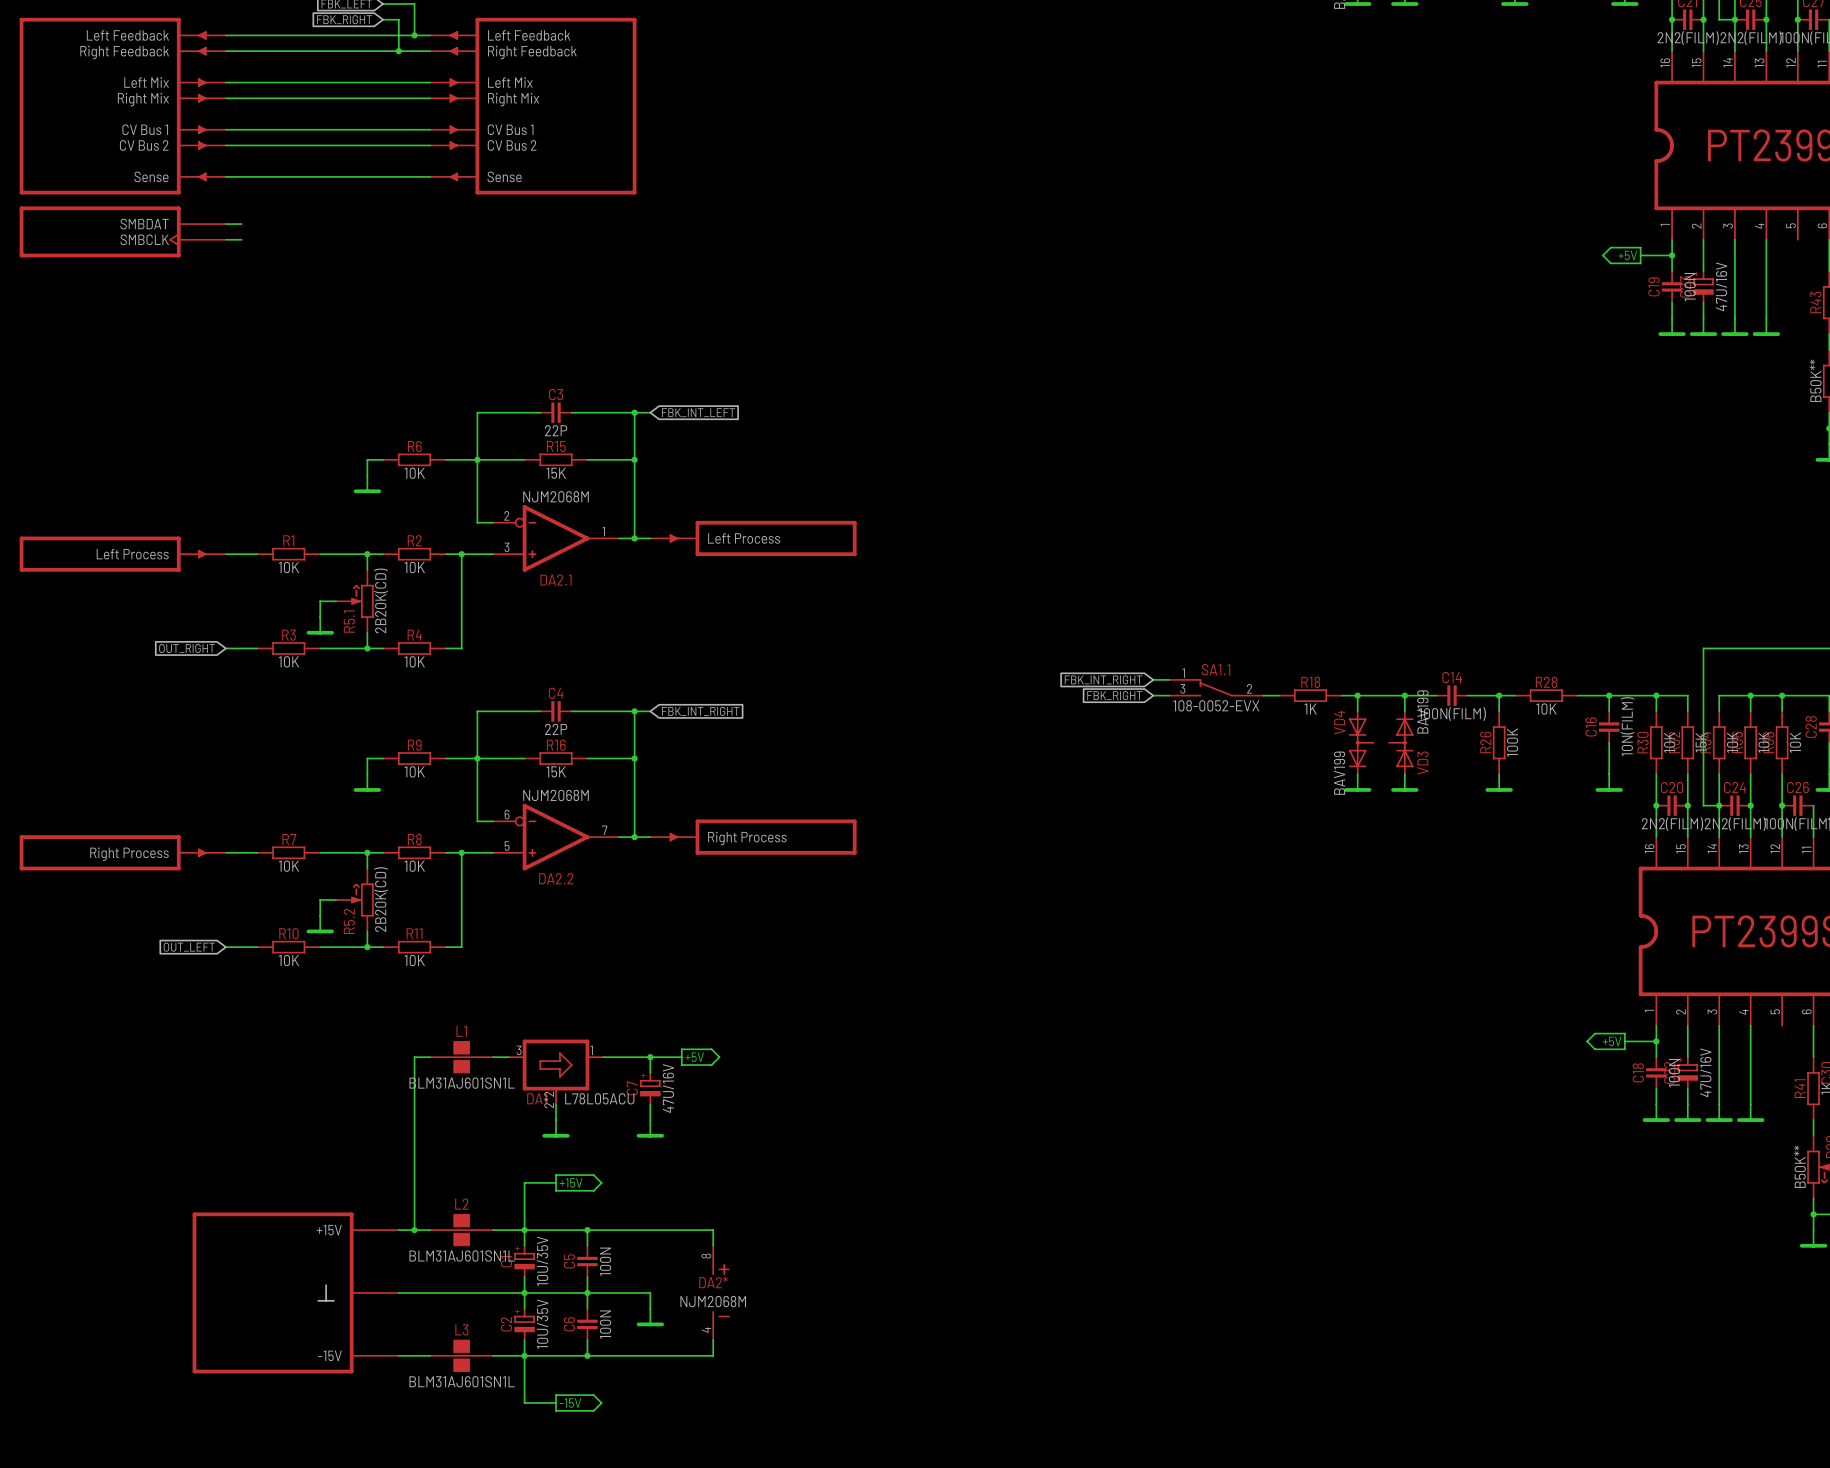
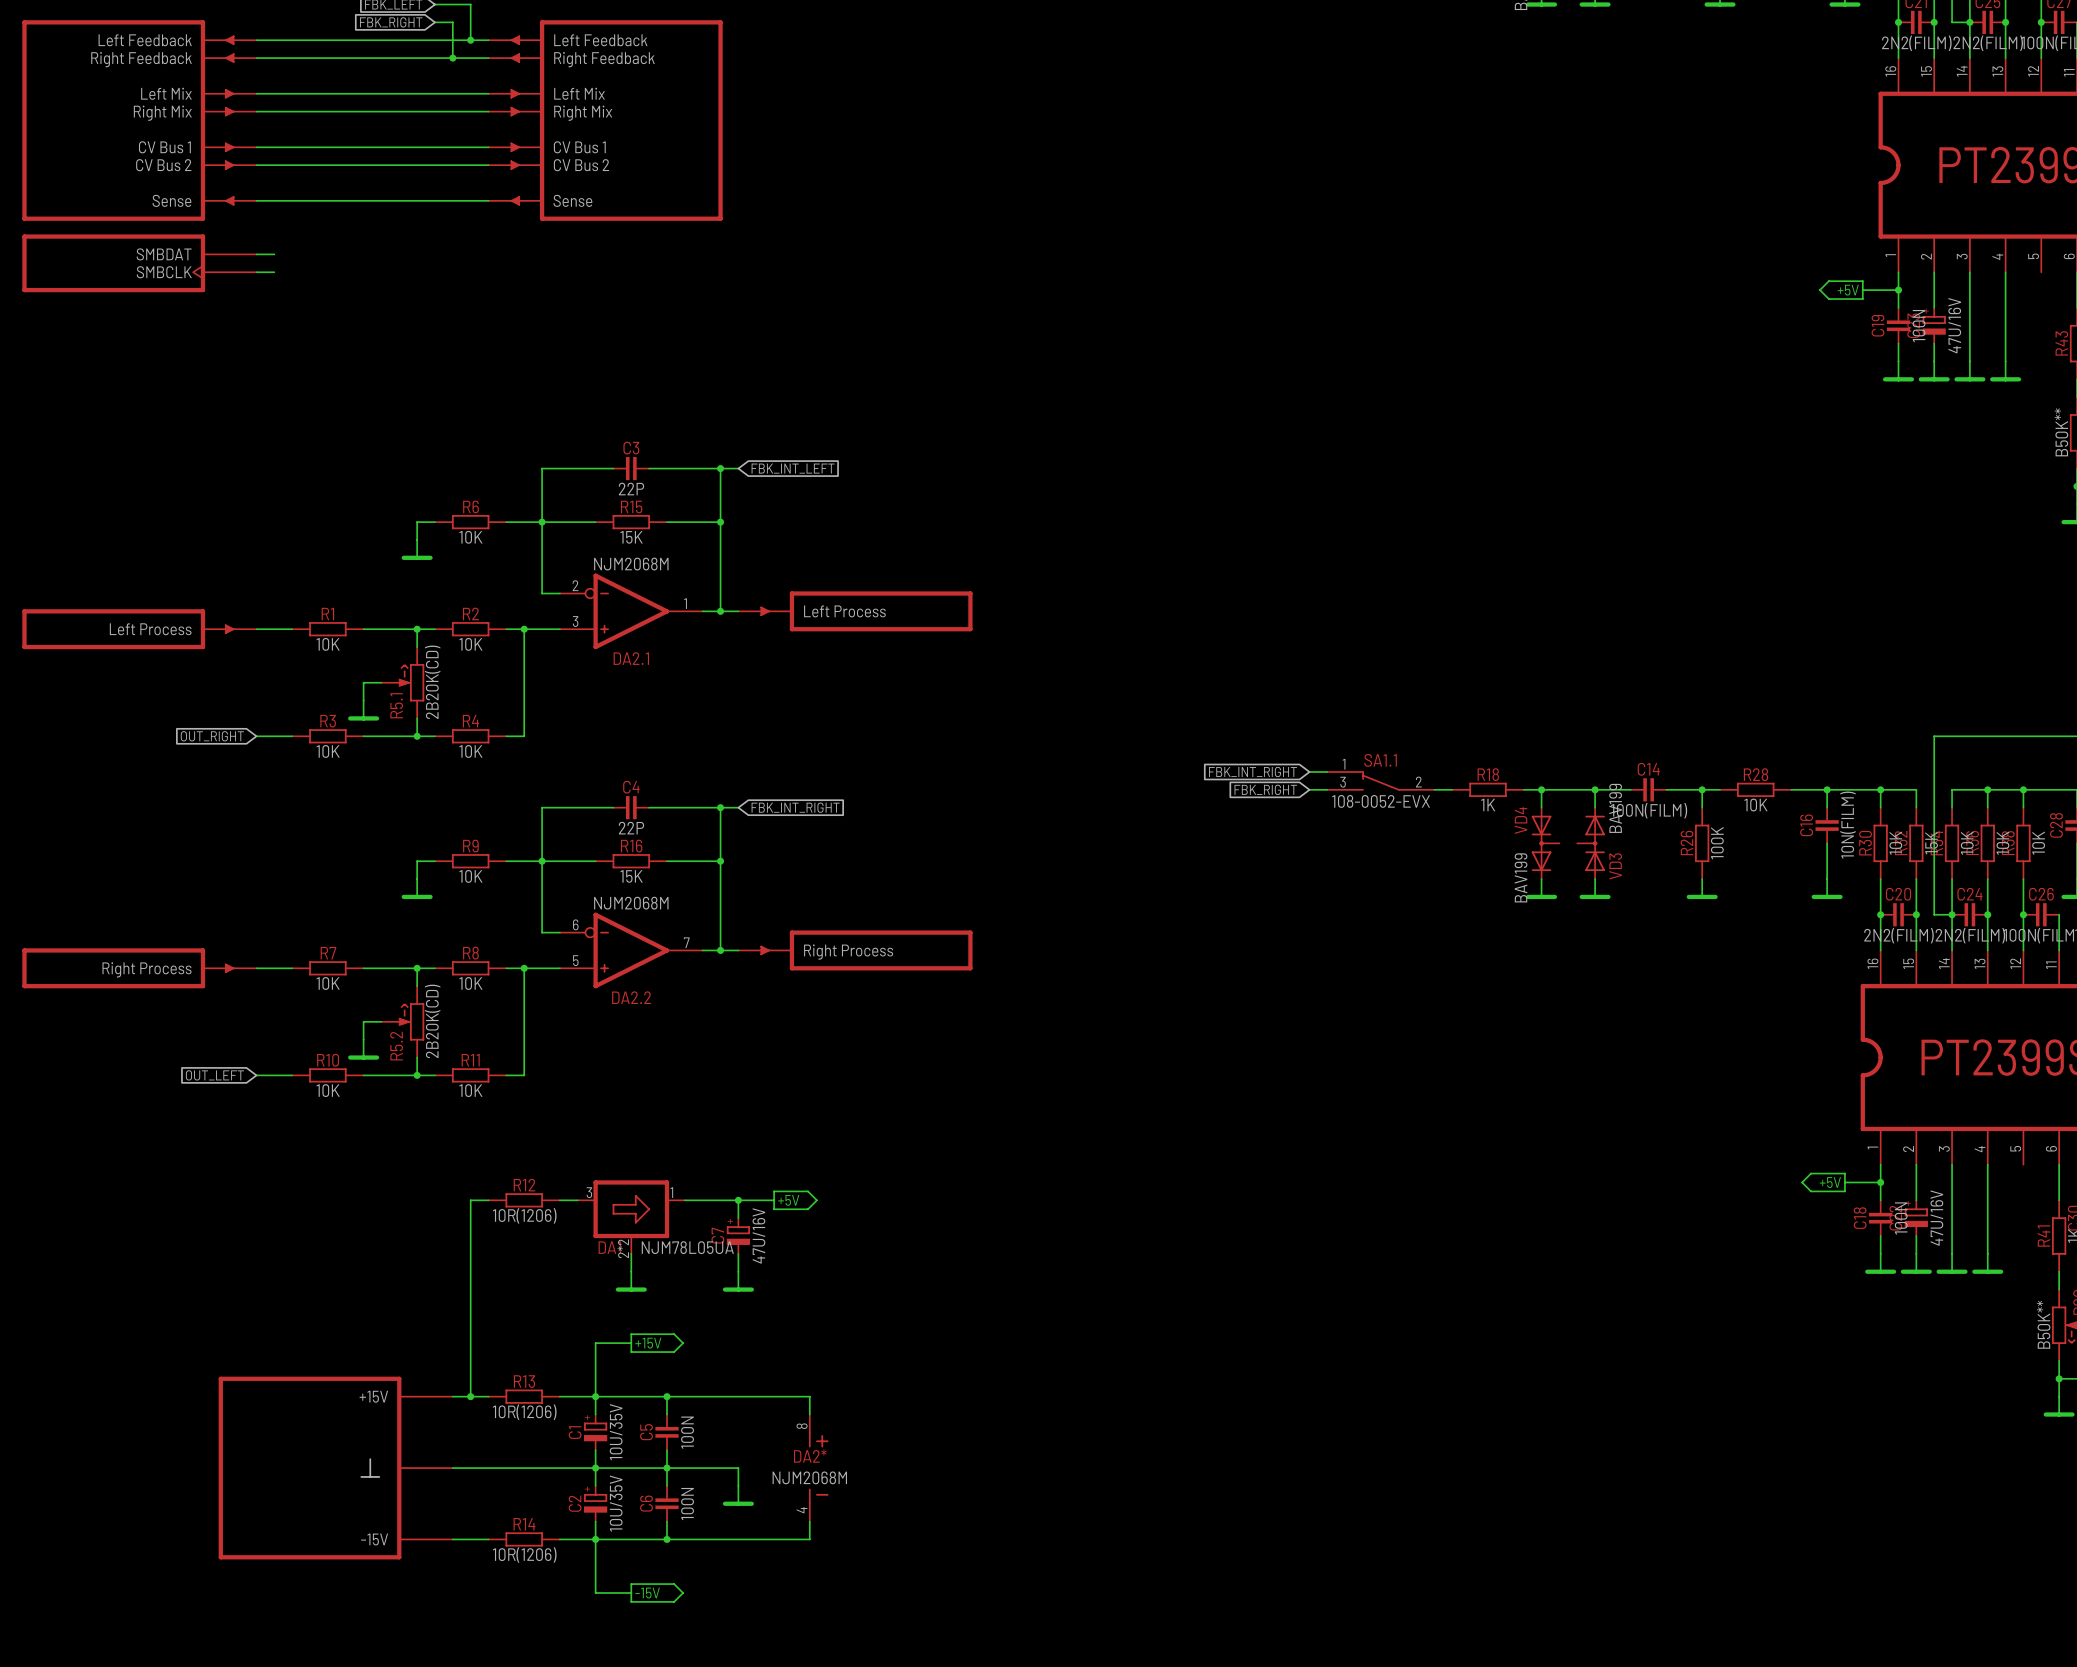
L1: BLM31AJ601SN1L (461, 1057) -> none
R12: none -> 10R(1206) (524, 1200)
DA1 value: L78L05ACU (599, 1098) -> NJM78L05UA (687, 1247)
L2: BLM31AJ601SN1L (461, 1230) -> none
R13: none -> 10R(1206) (524, 1396)
L3: BLM31AJ601SN1L (461, 1355) -> none
R14: none -> 10R(1206) (524, 1539)

